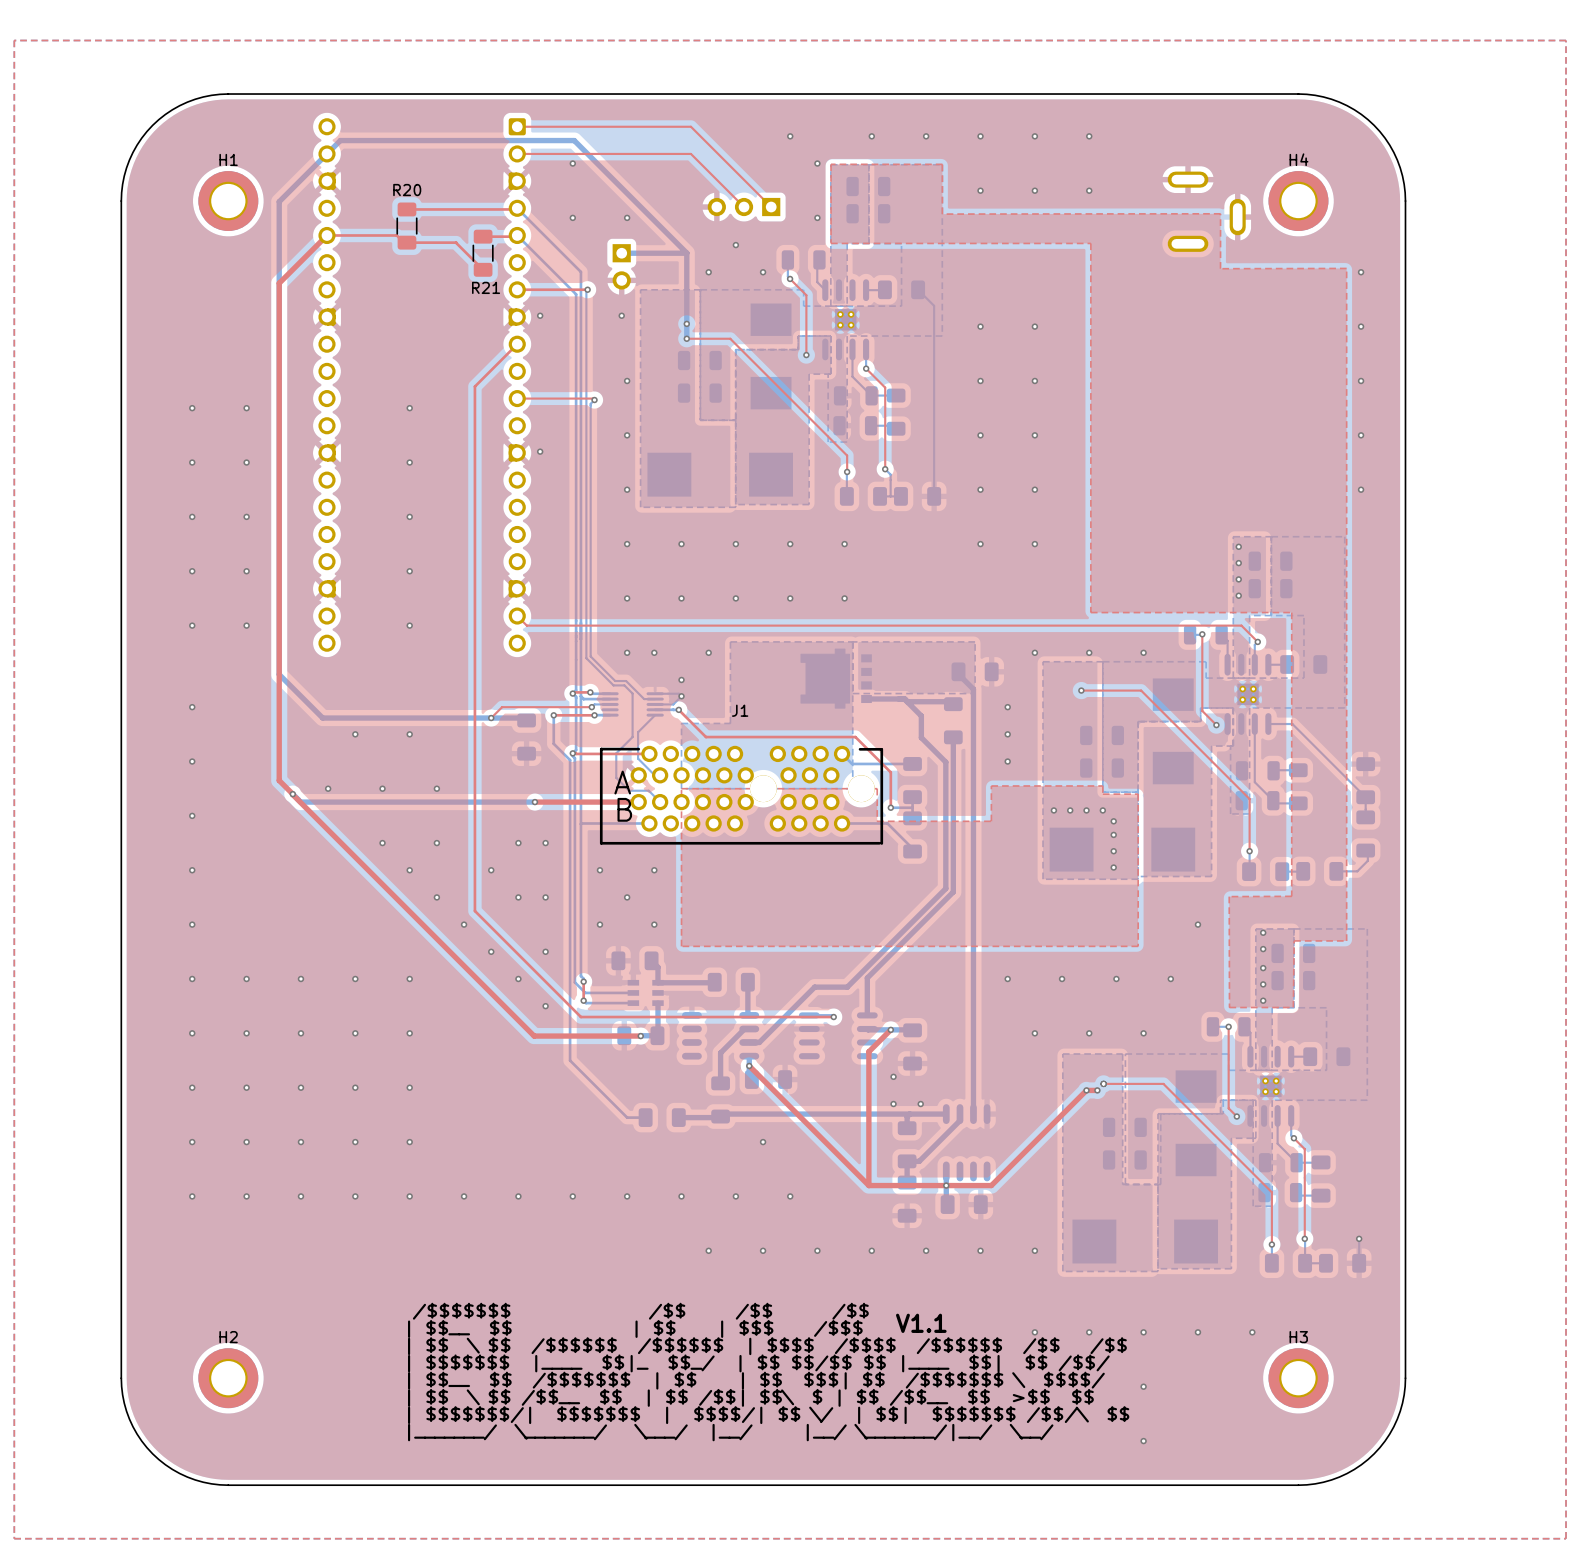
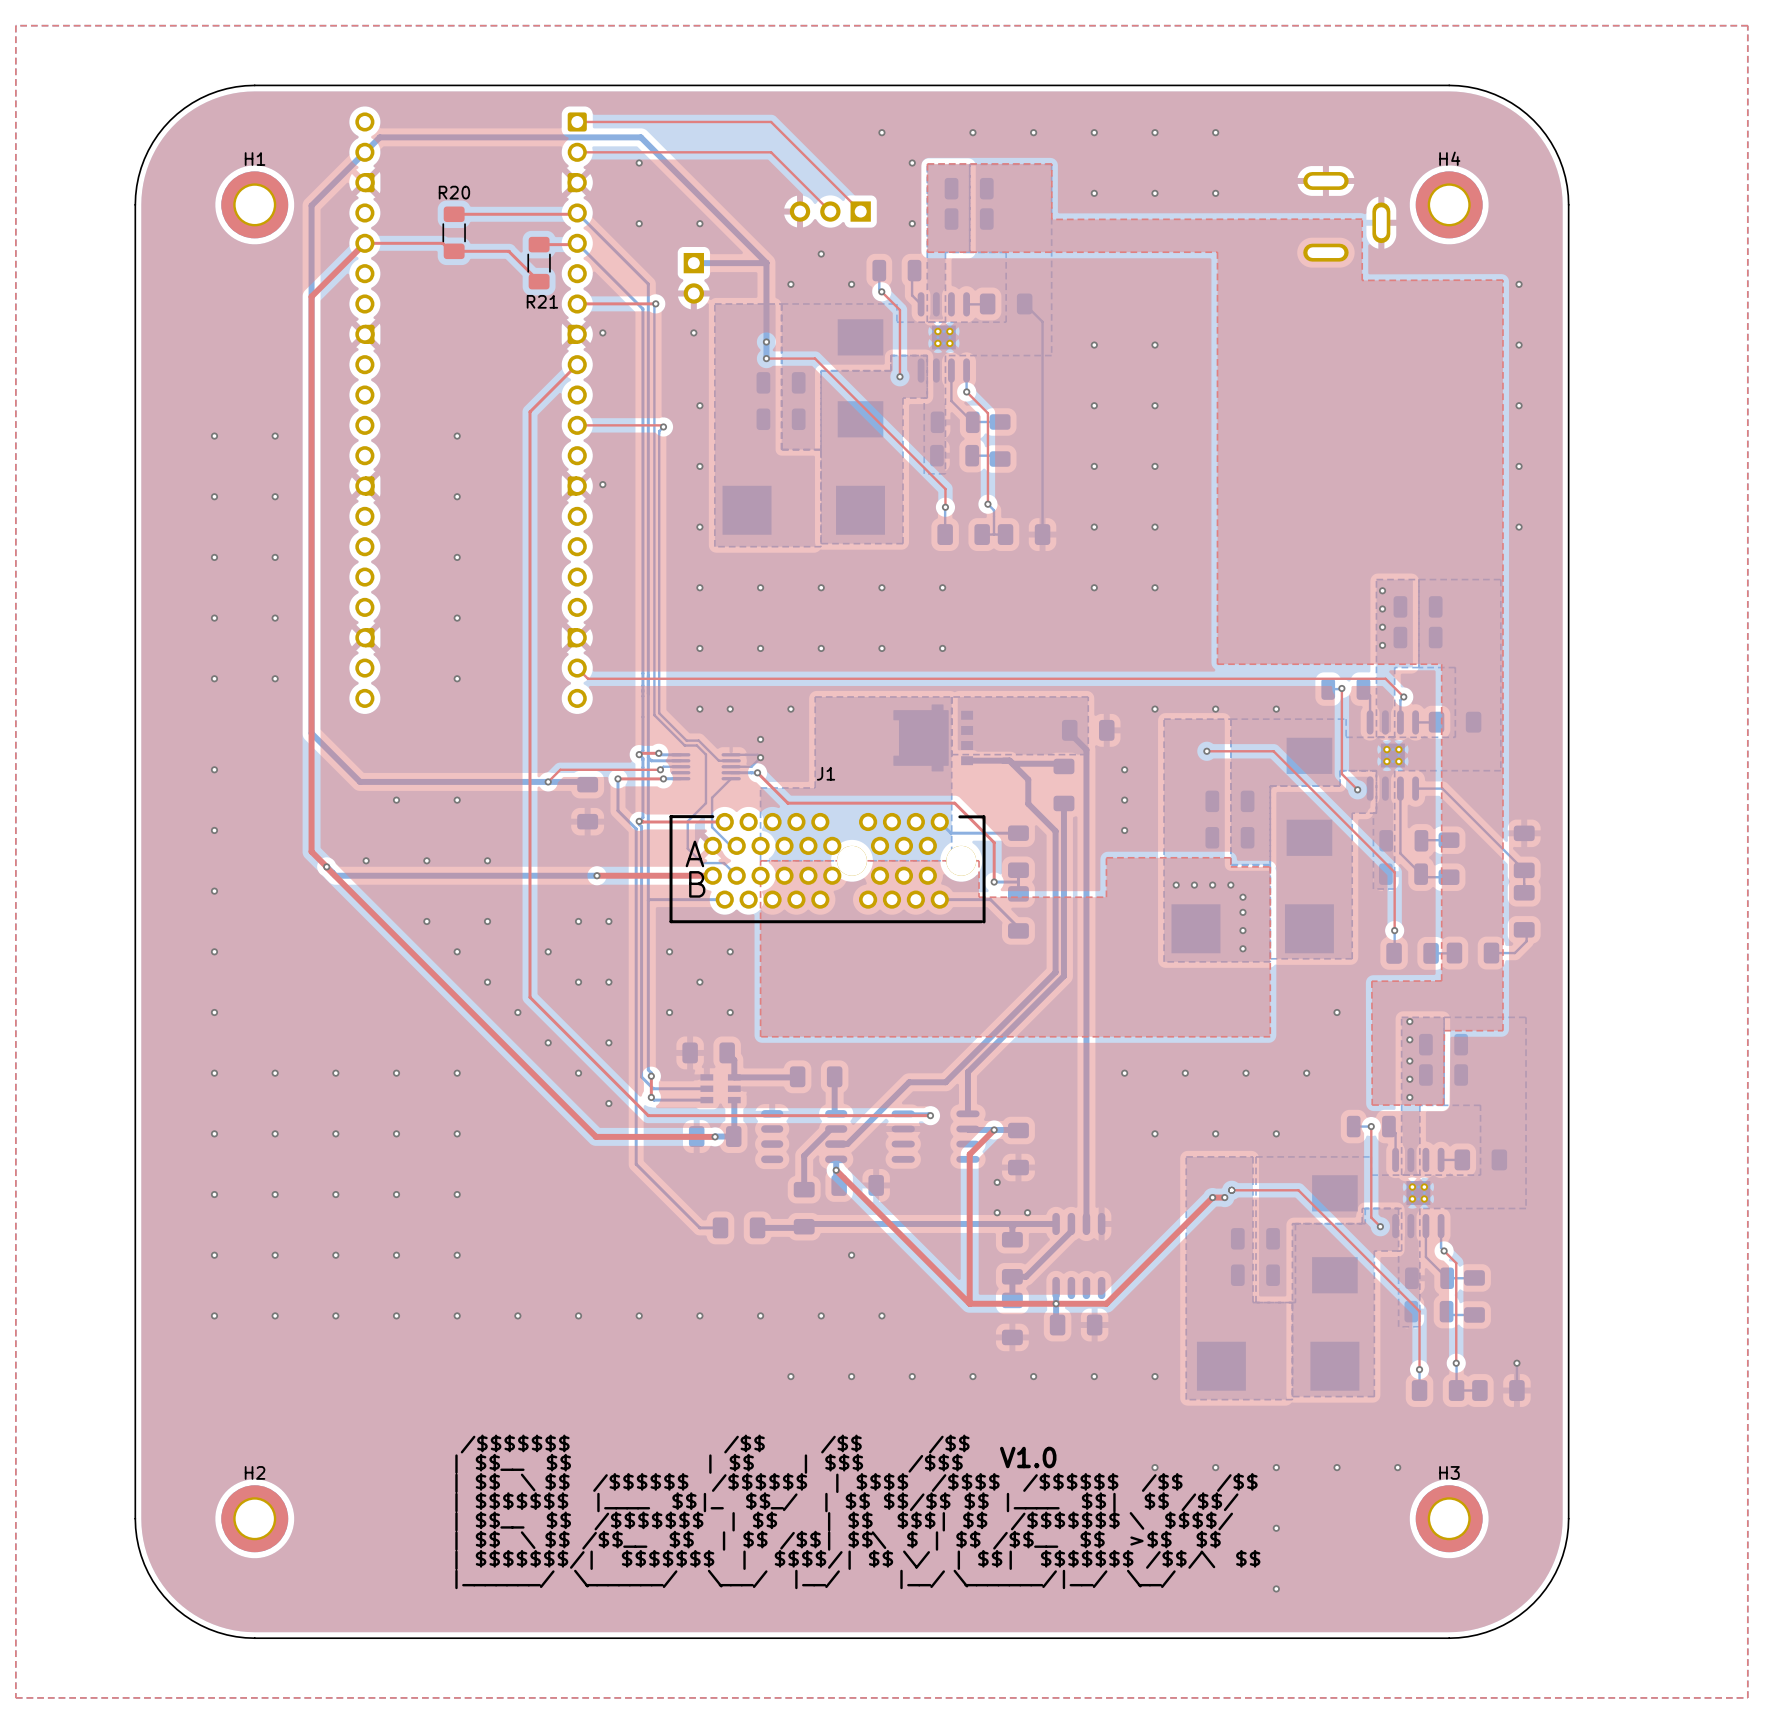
text: V1.1 (921, 1323) -> V1.0 (1028, 1457)

